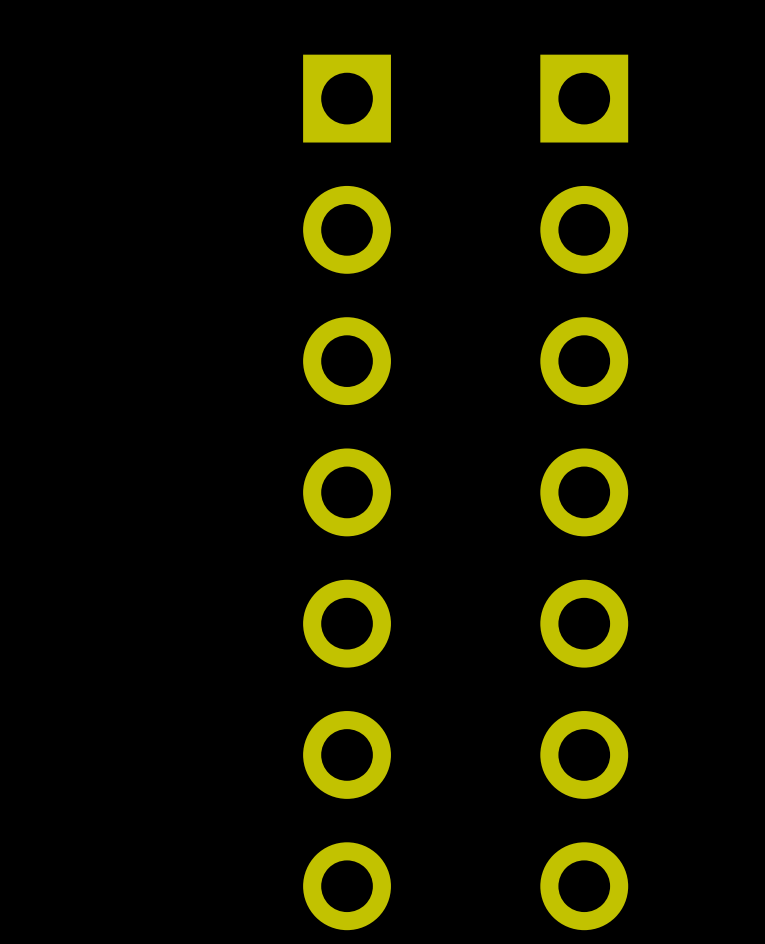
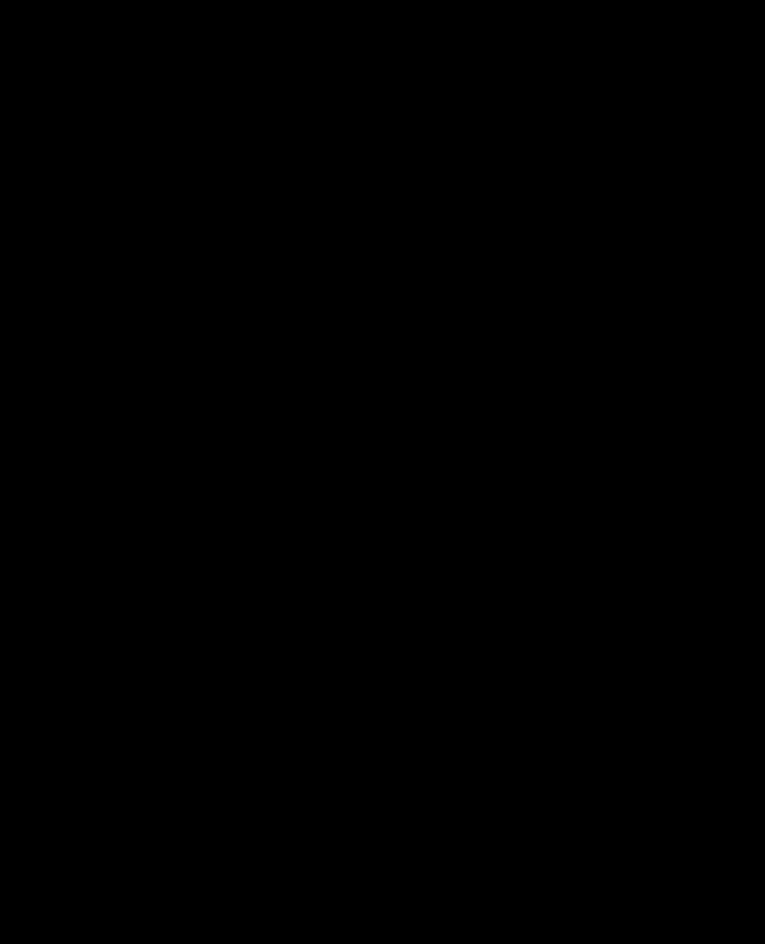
part: (347, 492) -> none
part: (584, 492) -> none

